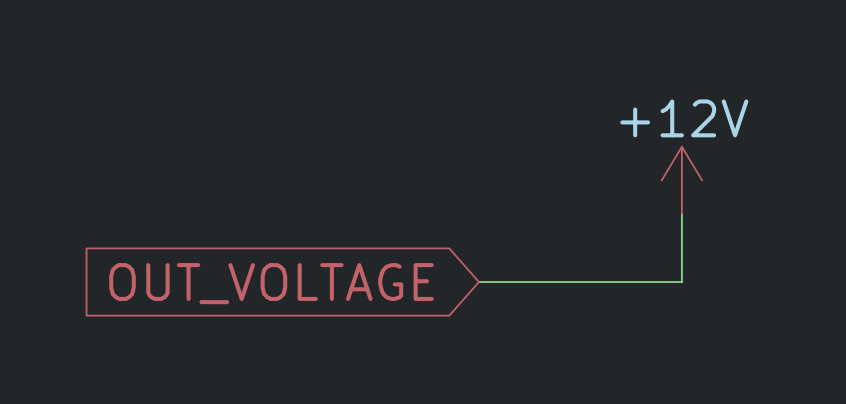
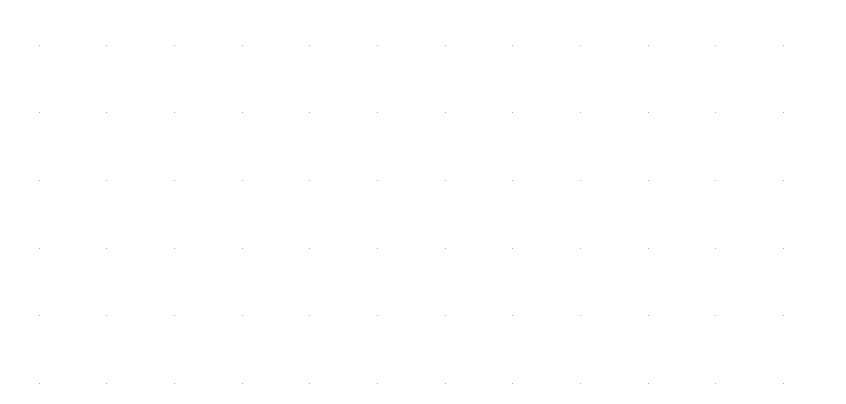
power symbol: +12V (681, 180) -> none
wire: (681, 214) (681, 282) (478, 282) -> none
global label: OUT_VOLTAGE (271, 283) -> none

